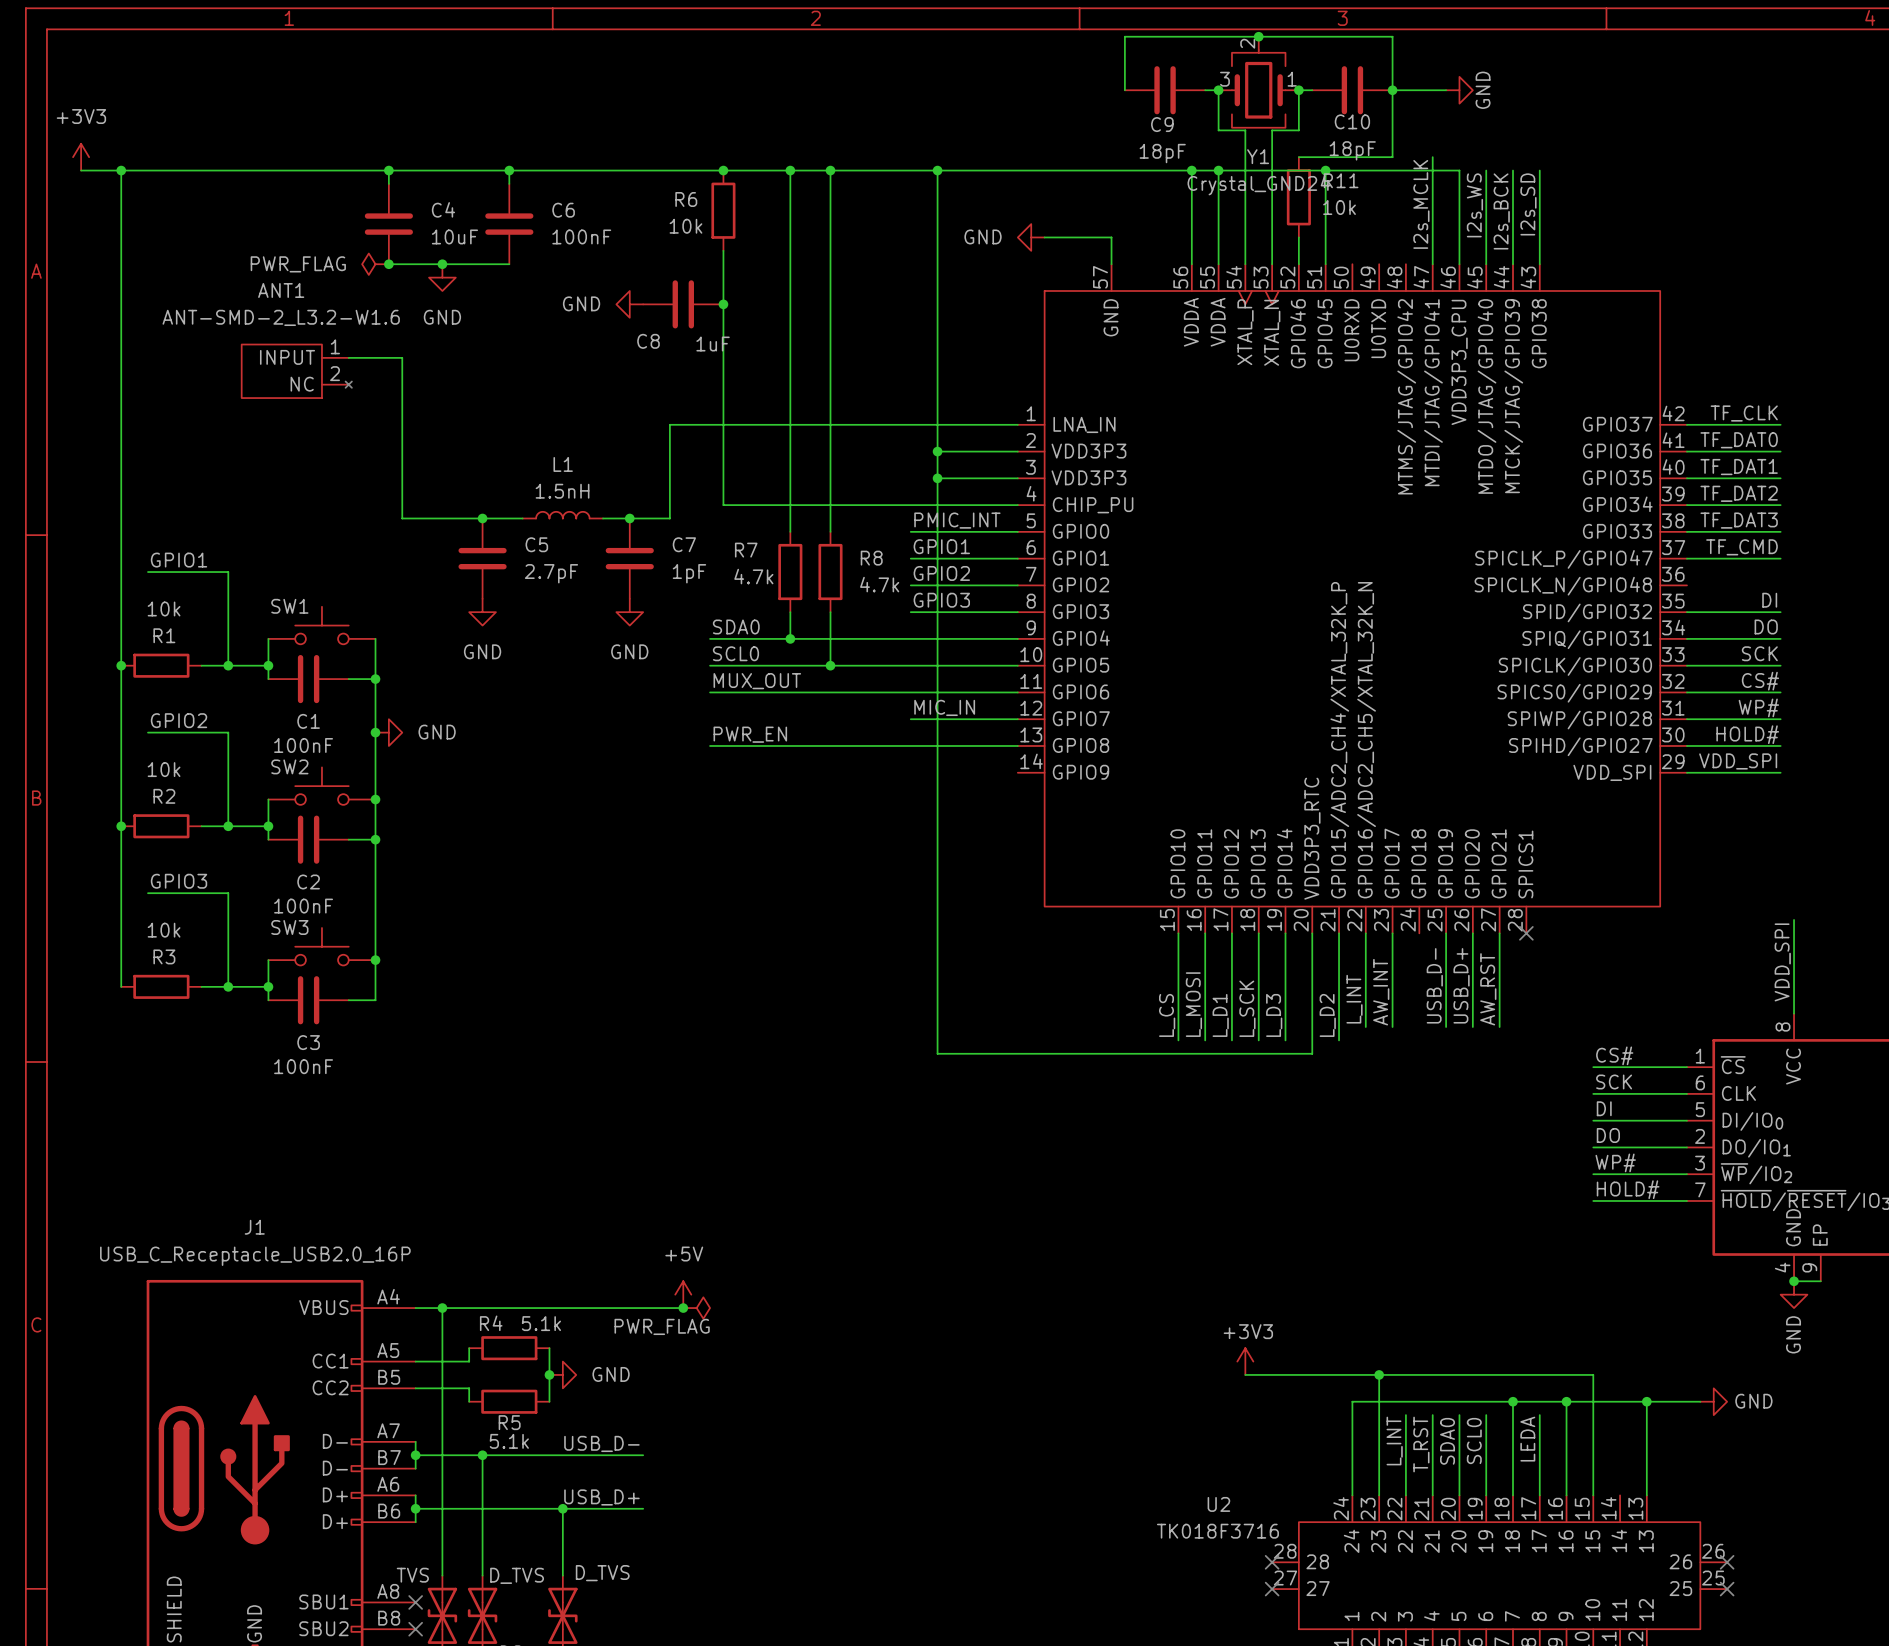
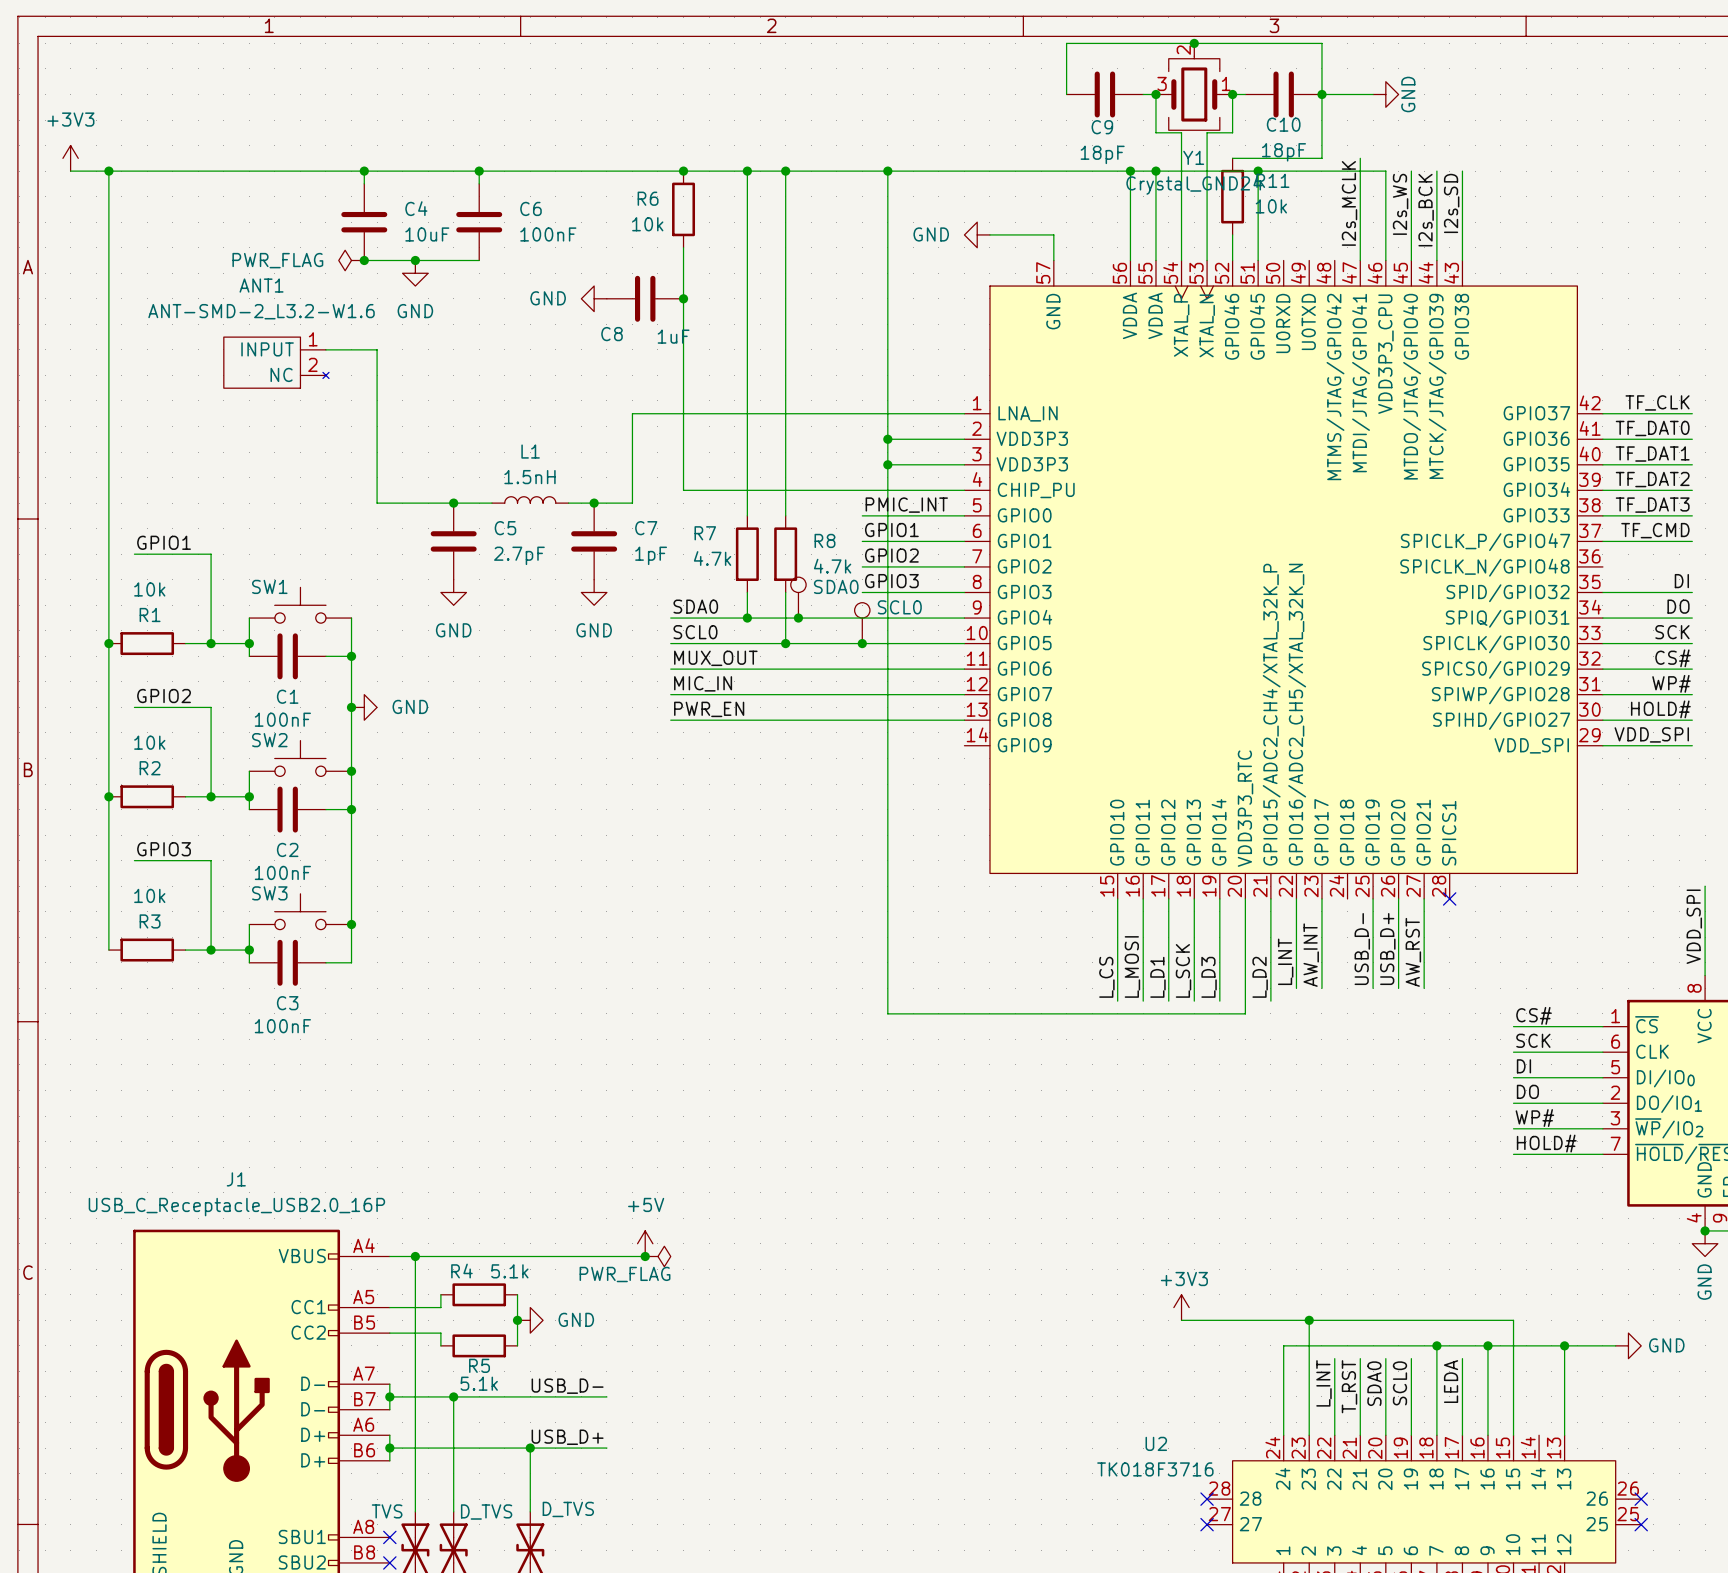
SDA0: none -> (798, 597)
junction: none -> (798, 618)
SCL0: none -> (862, 623)
junction: none -> (862, 643)
label position: MIC_IN (944, 707) -> MIC_IN (703, 683)
wire: none -> (670, 694) (862, 694)

